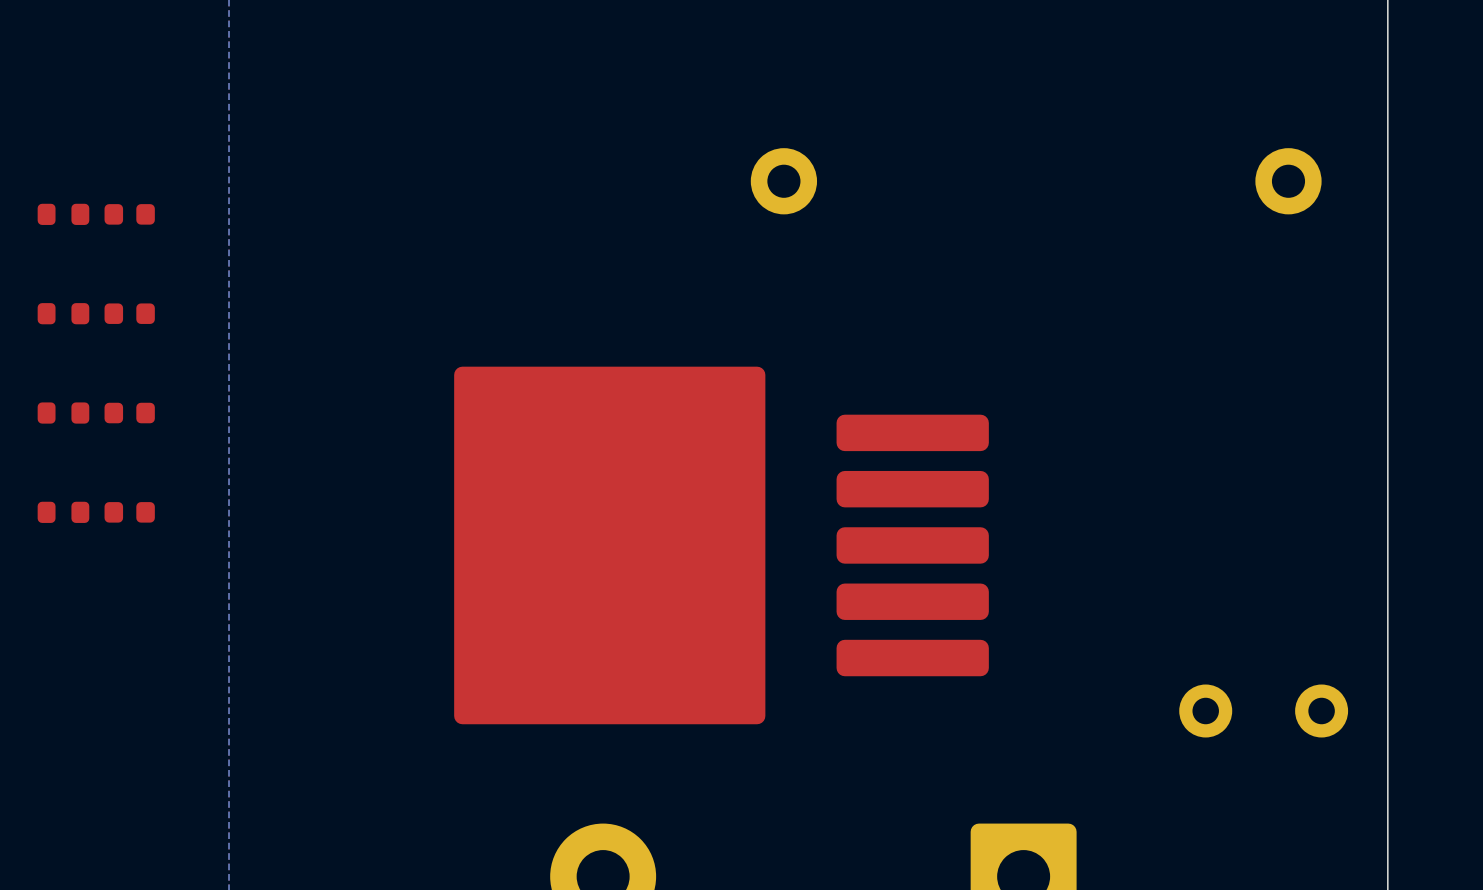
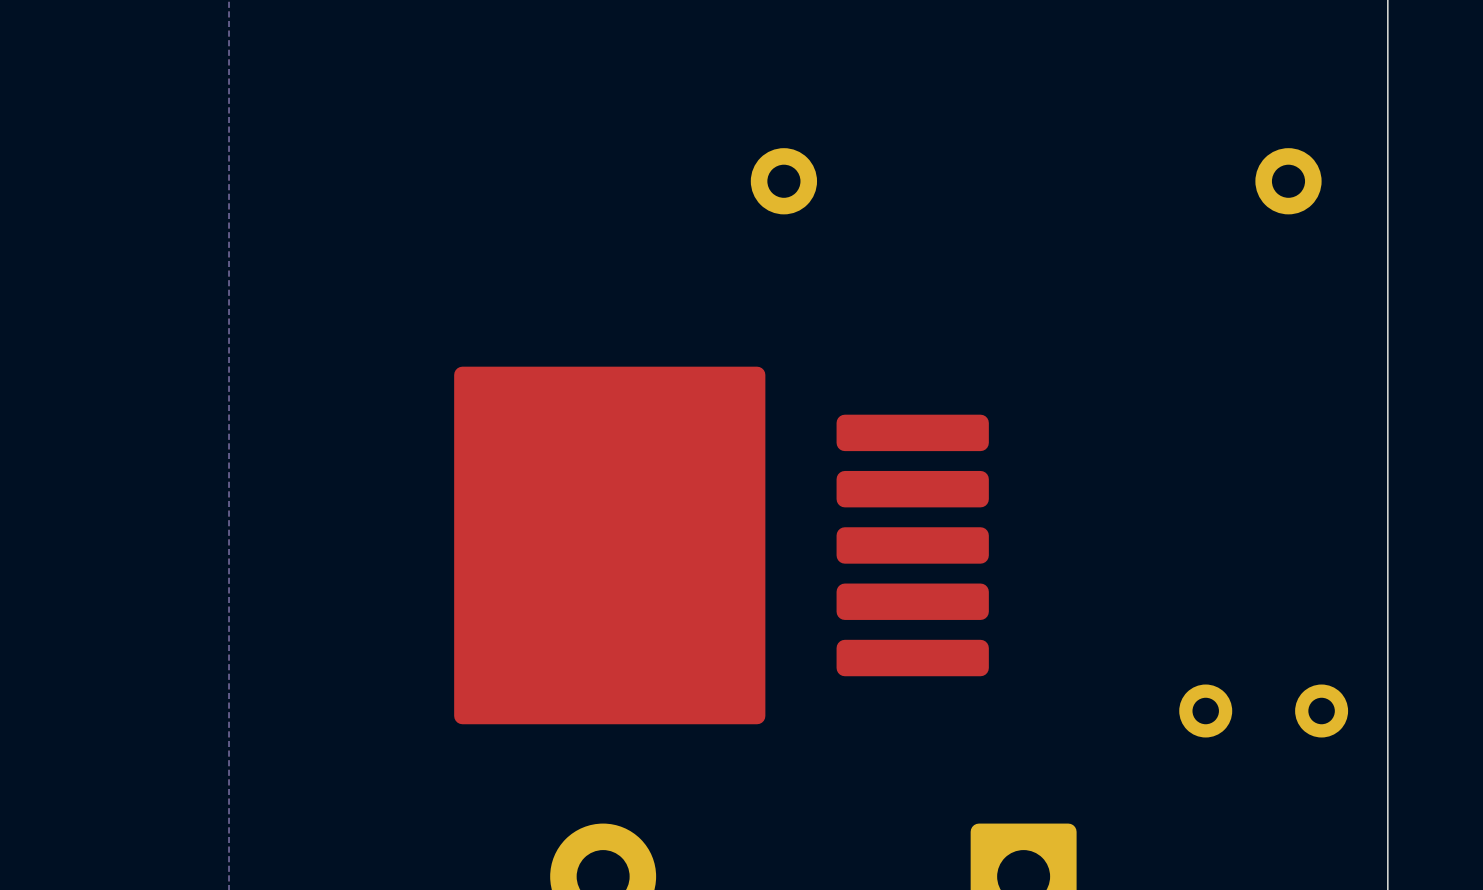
part: (63, 214) -> none
part: (129, 214) -> none
part: (63, 313) -> none
part: (129, 313) -> none
part: (63, 413) -> none
part: (129, 413) -> none
part: (63, 512) -> none
part: (129, 512) -> none

